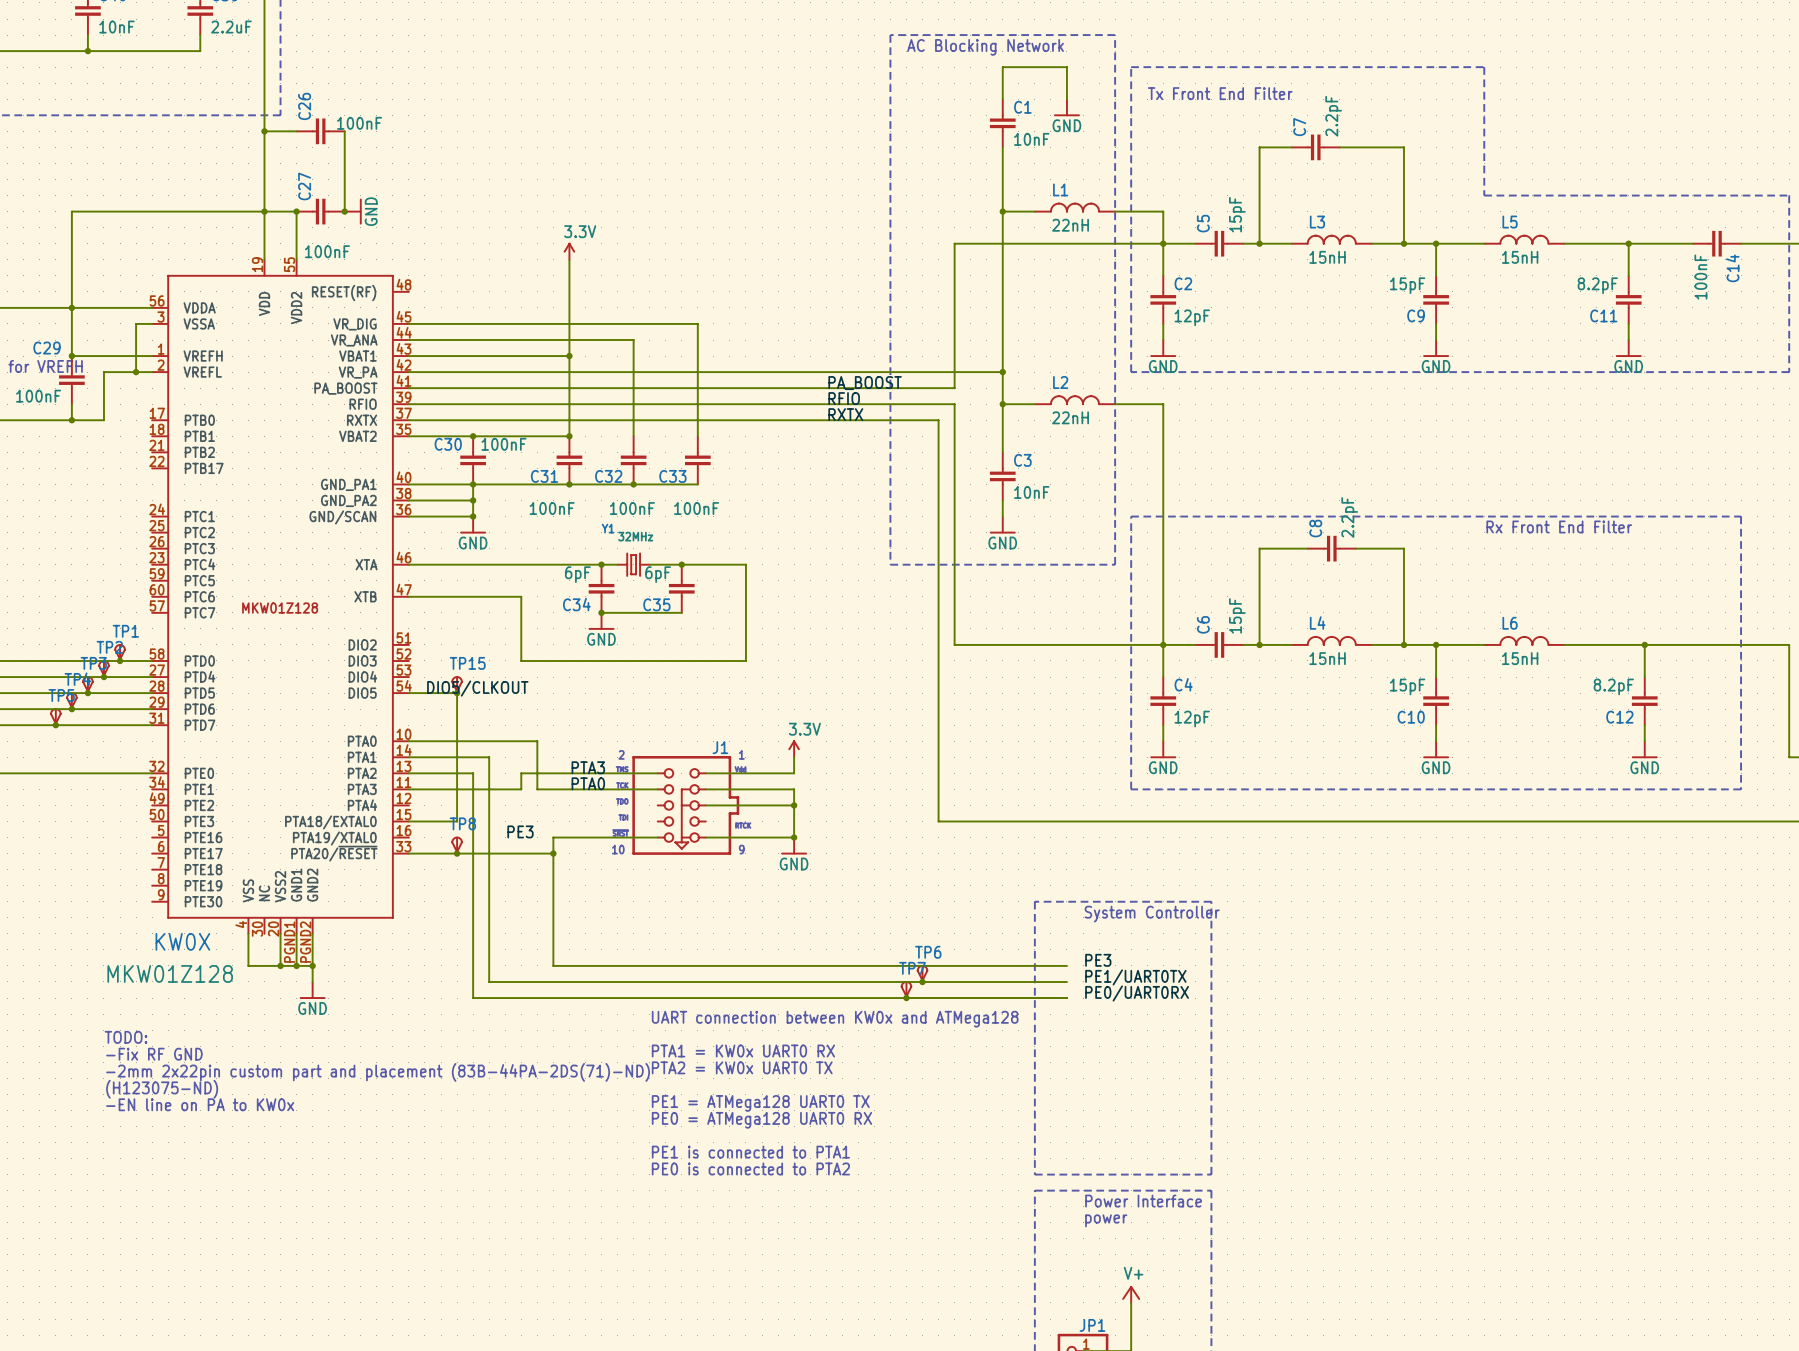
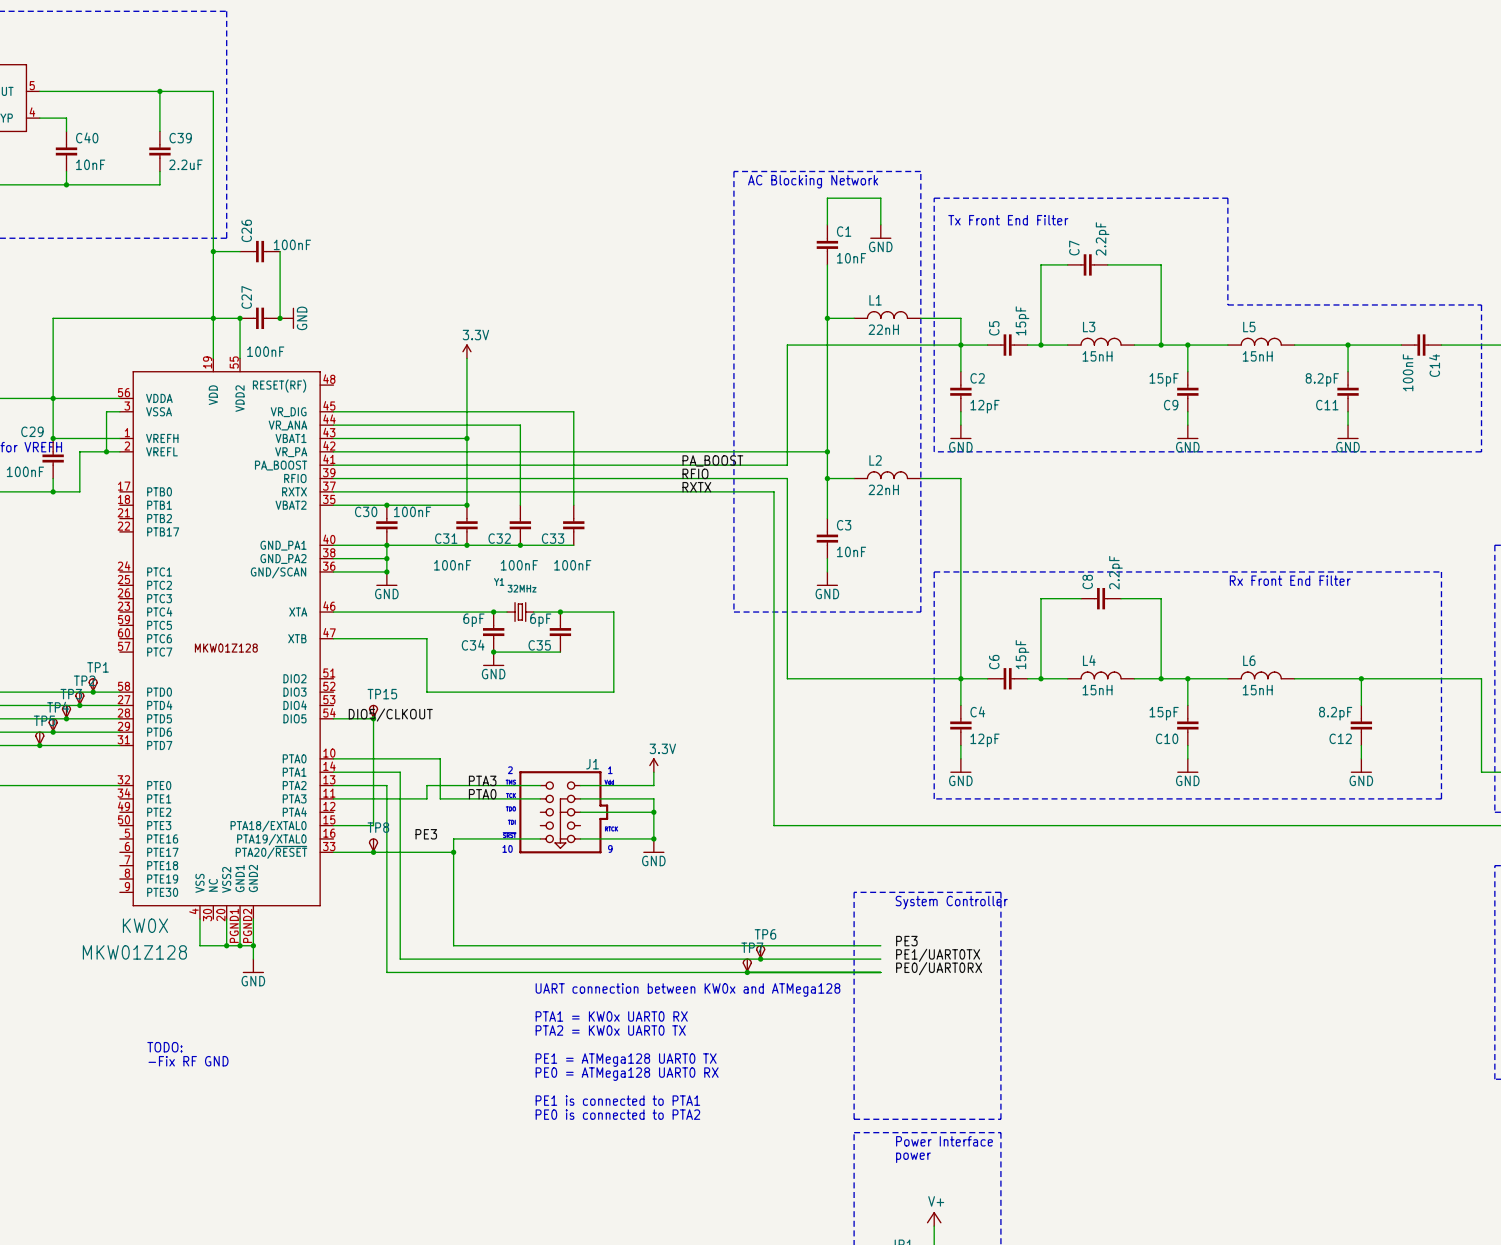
text position: TODO: (126, 1037) -> TODO: (164, 1047)
text position: -Fix RF GND (154, 1054) -> -Fix RF GND (188, 1061)
text: -2mm 2x22pin custom part and placement (83B-44PA-2DS(71)-ND) (378, 1072) -> none
text: (H123075-ND) (162, 1089) -> none
text: -EN line on PA to KW0x (200, 1104) -> none

